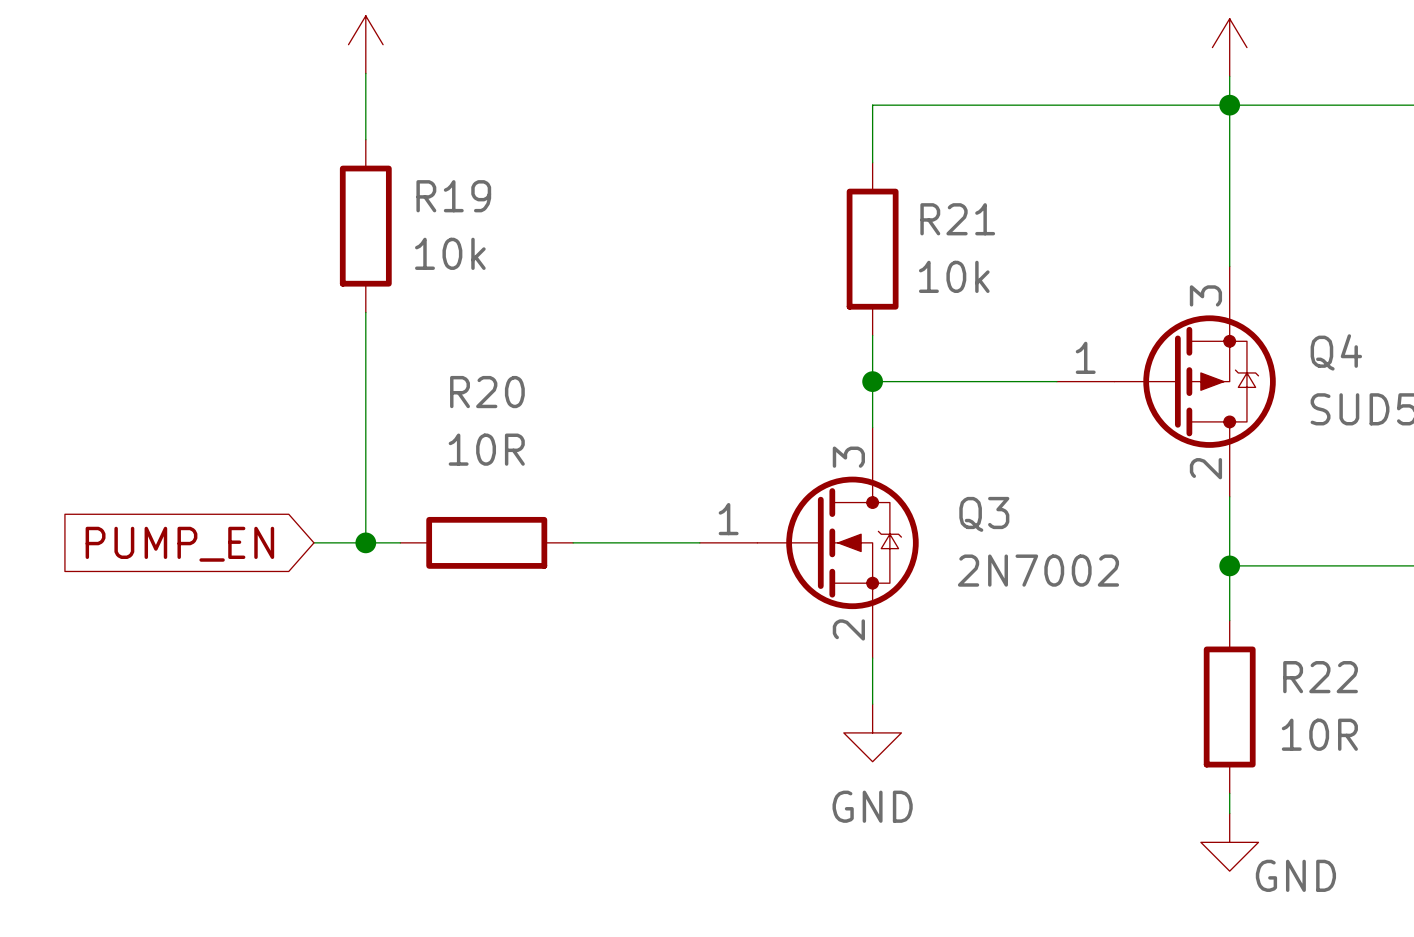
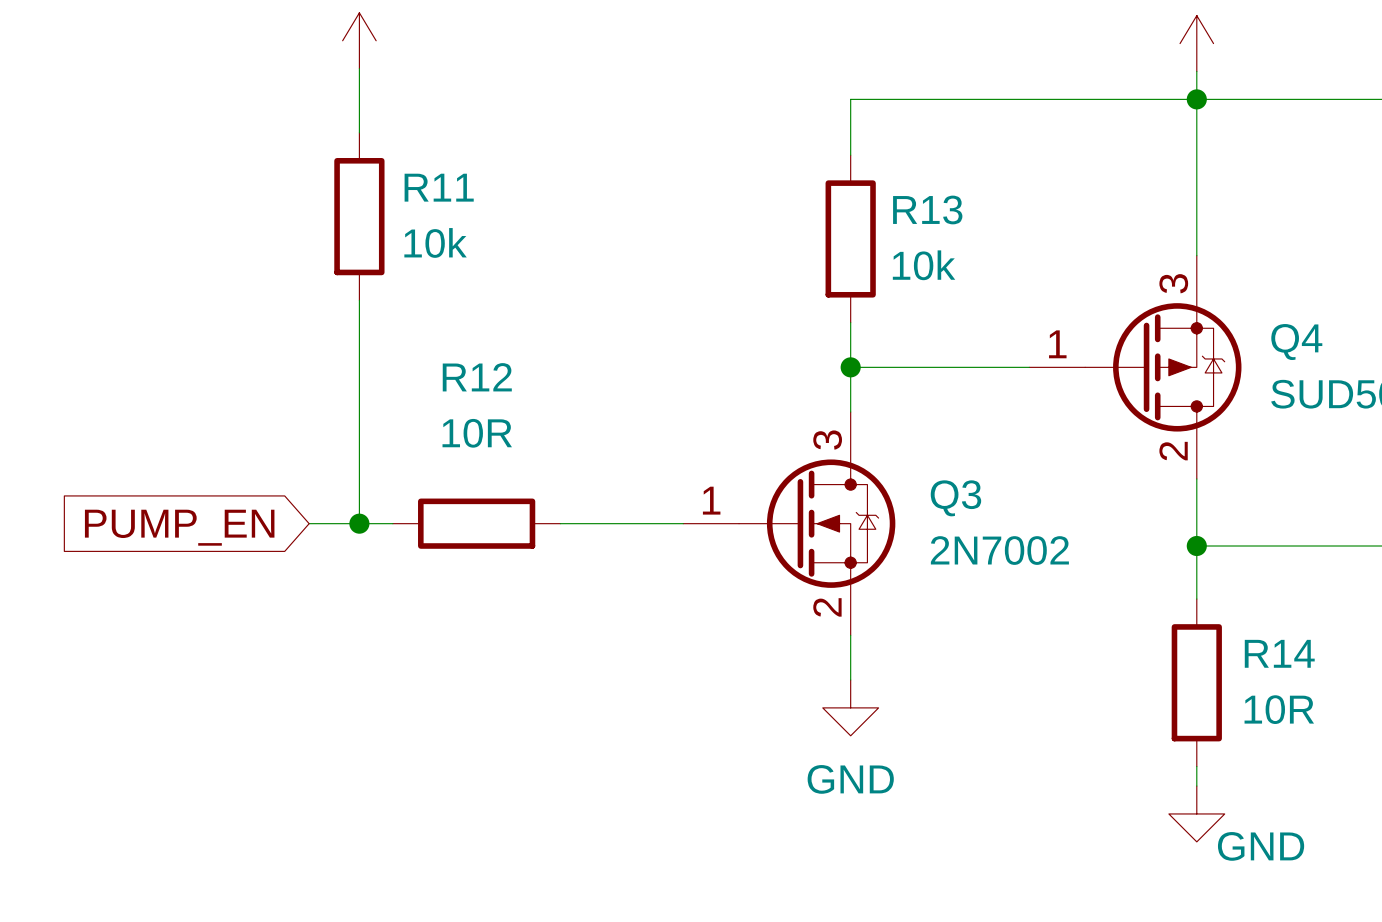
R19 name: R19 (453, 196) -> R11 (439, 187)
R21 name: R21 (957, 219) -> R13 (927, 209)
R20 name: R20 (487, 392) -> R12 (477, 377)
R22 name: R22 (1320, 677) -> R14 (1279, 653)

